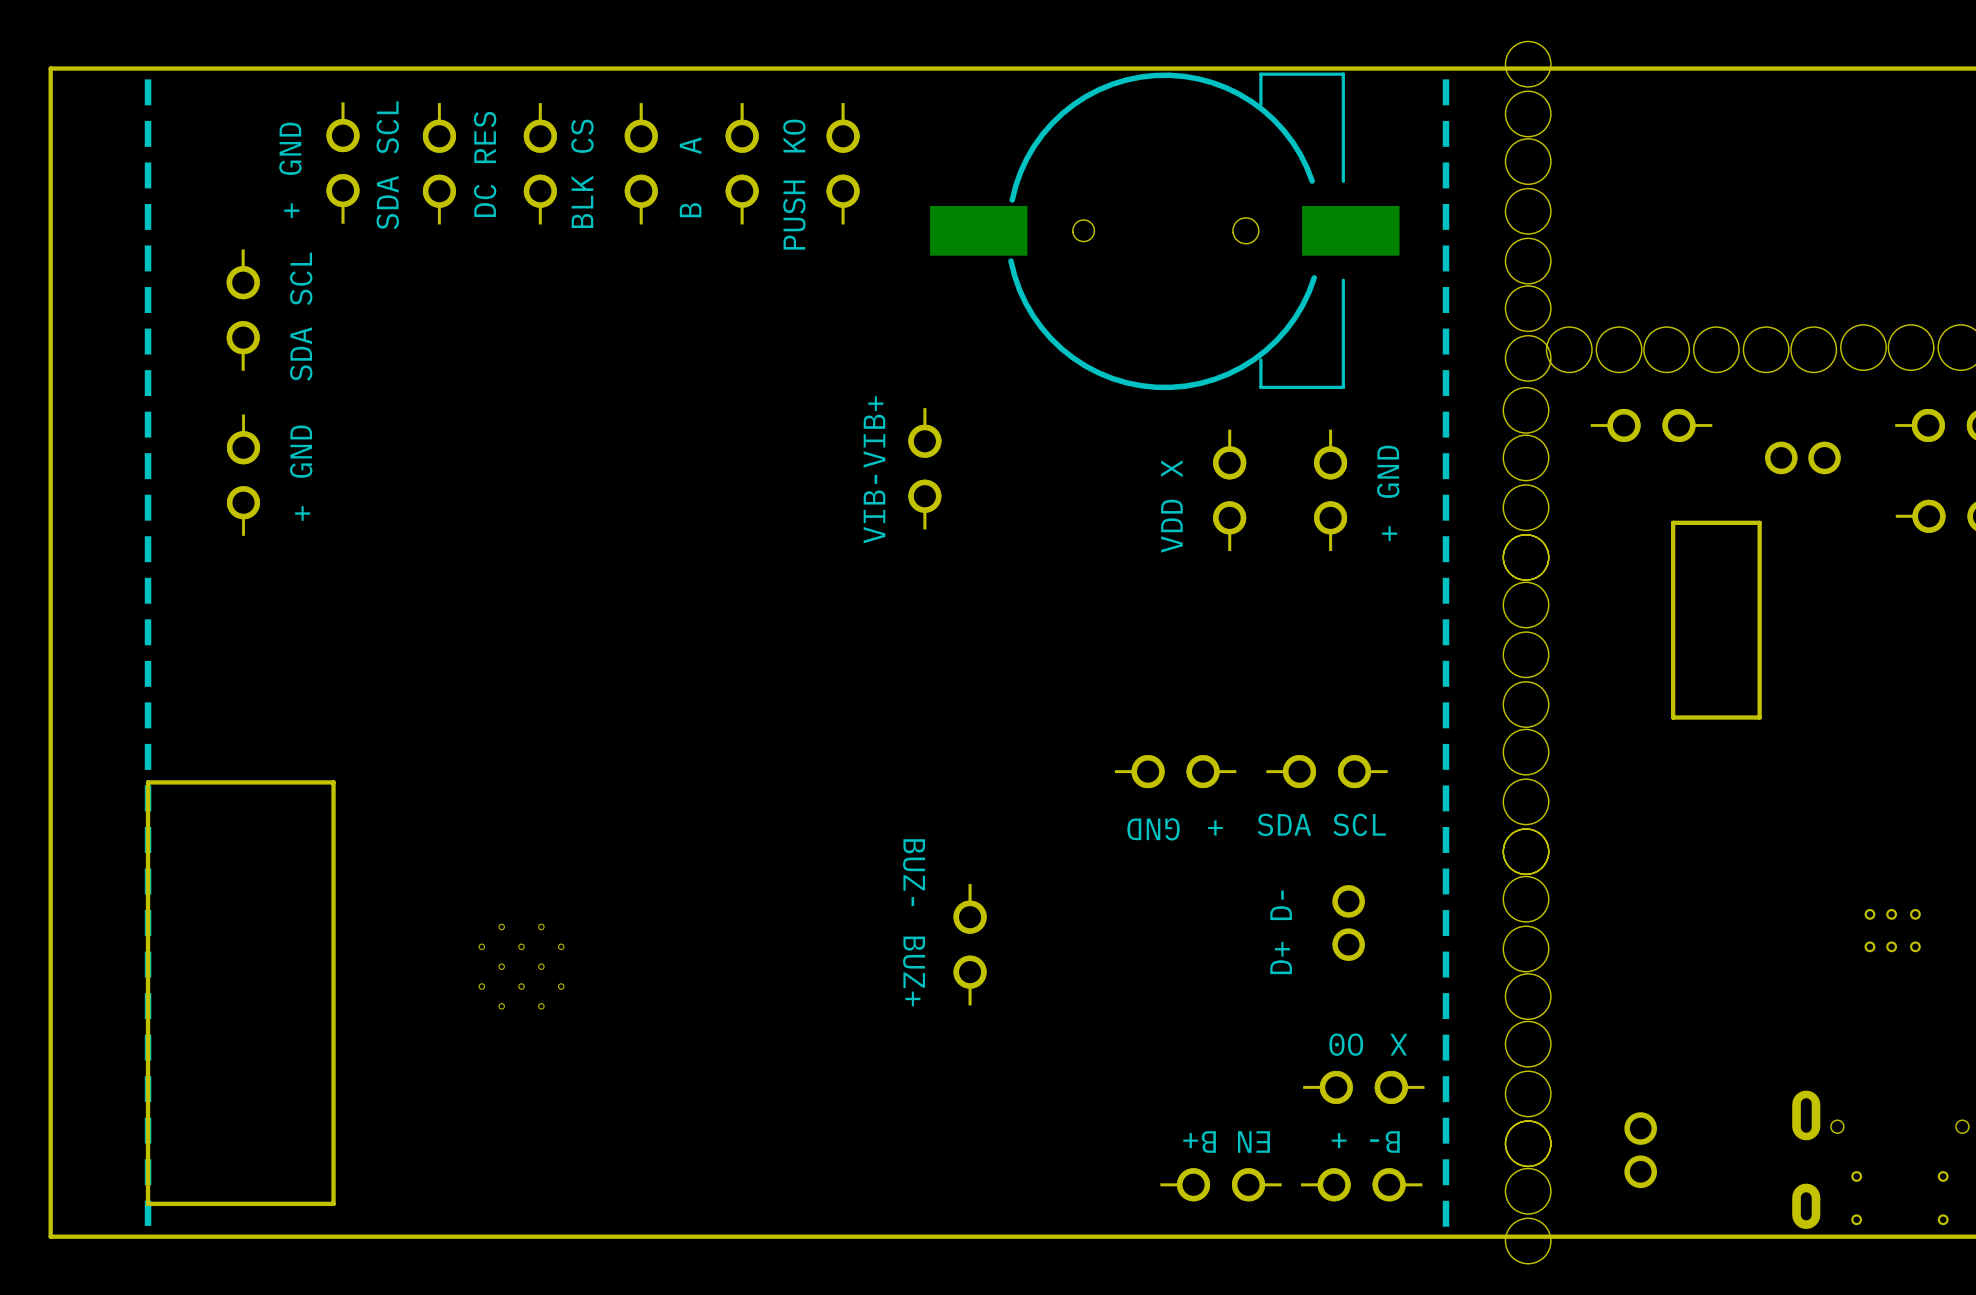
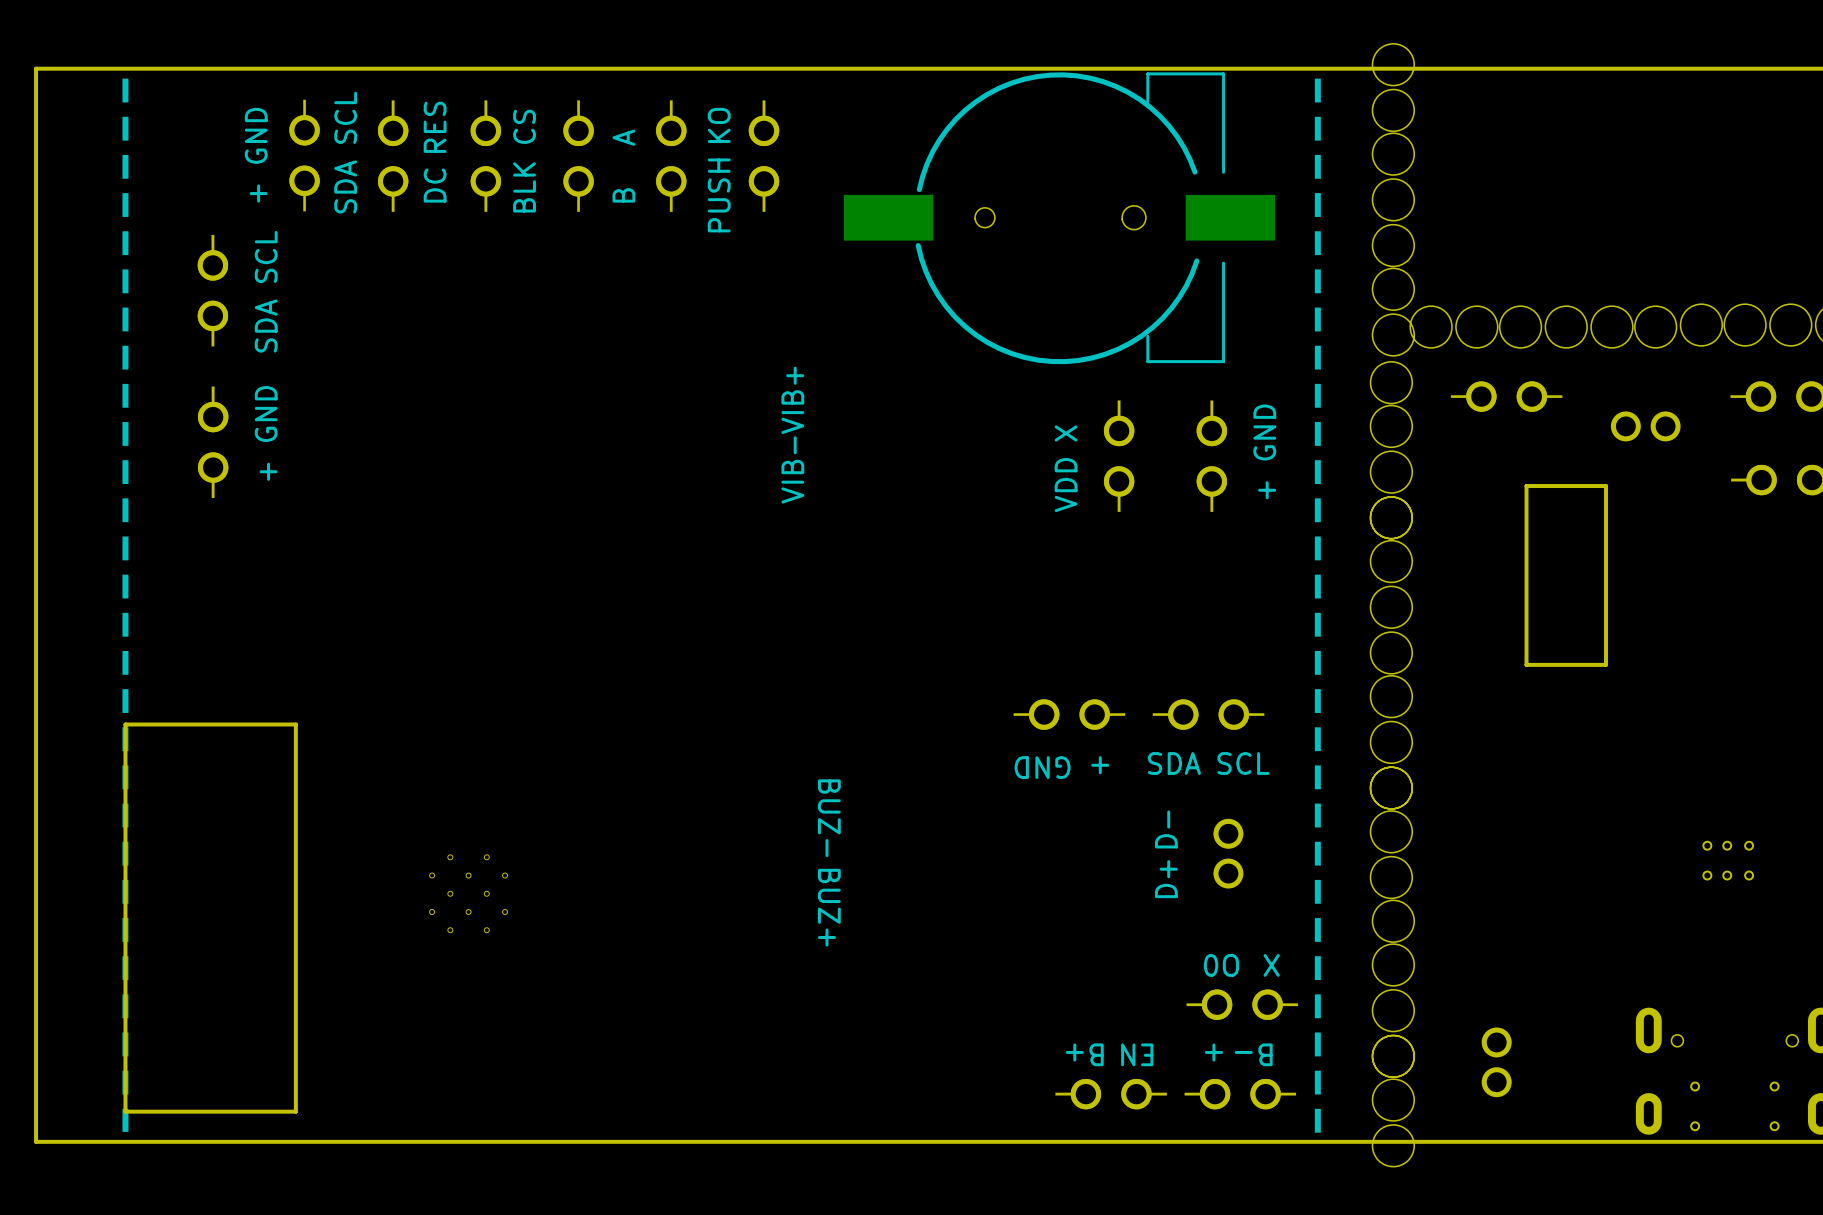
part: (924, 468) -> none
part: (970, 944) -> none

